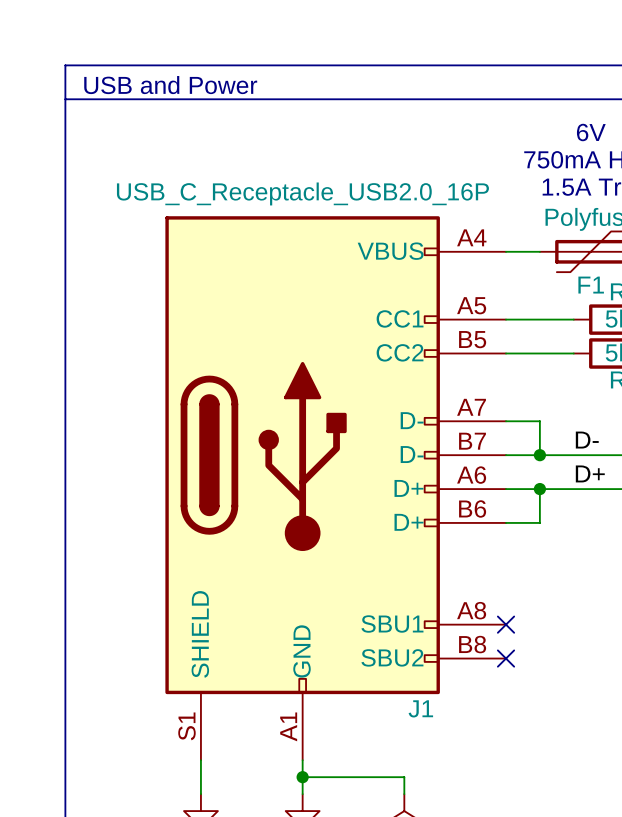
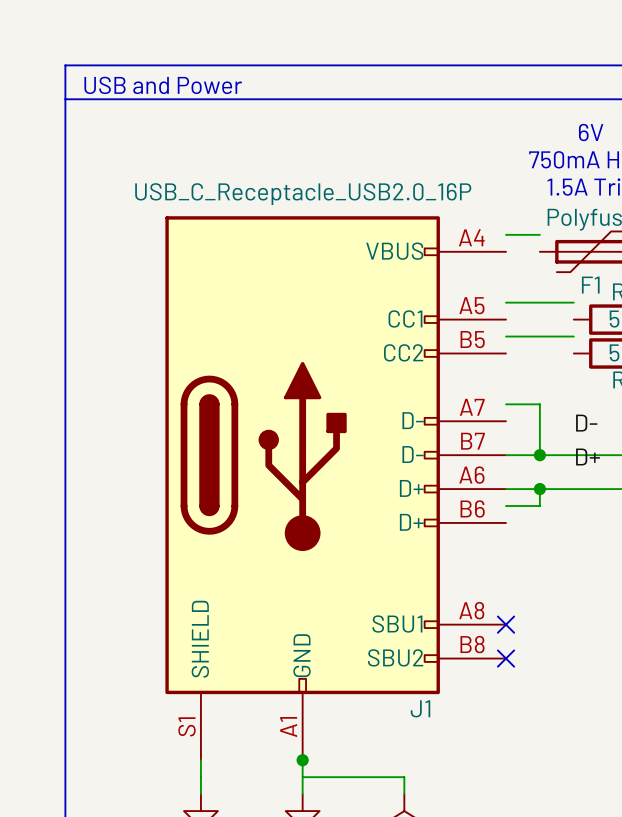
wire: (506, 251) (539, 251) -> (506, 234) (539, 234)
wire: (506, 319) (573, 319) -> (506, 302) (573, 302)
wire: (506, 353) (573, 353) -> (506, 336) (573, 336)
wire: (506, 421) (539, 421) -> (506, 404) (539, 404) (539, 421)
label position: D- (587, 440) -> D- (586, 423)
label position: D+ (590, 473) -> D+ (588, 456)
wire: (539, 506) (539, 522) (506, 522) -> (539, 506) (506, 506)
junction position: (302, 777) -> (302, 760)

